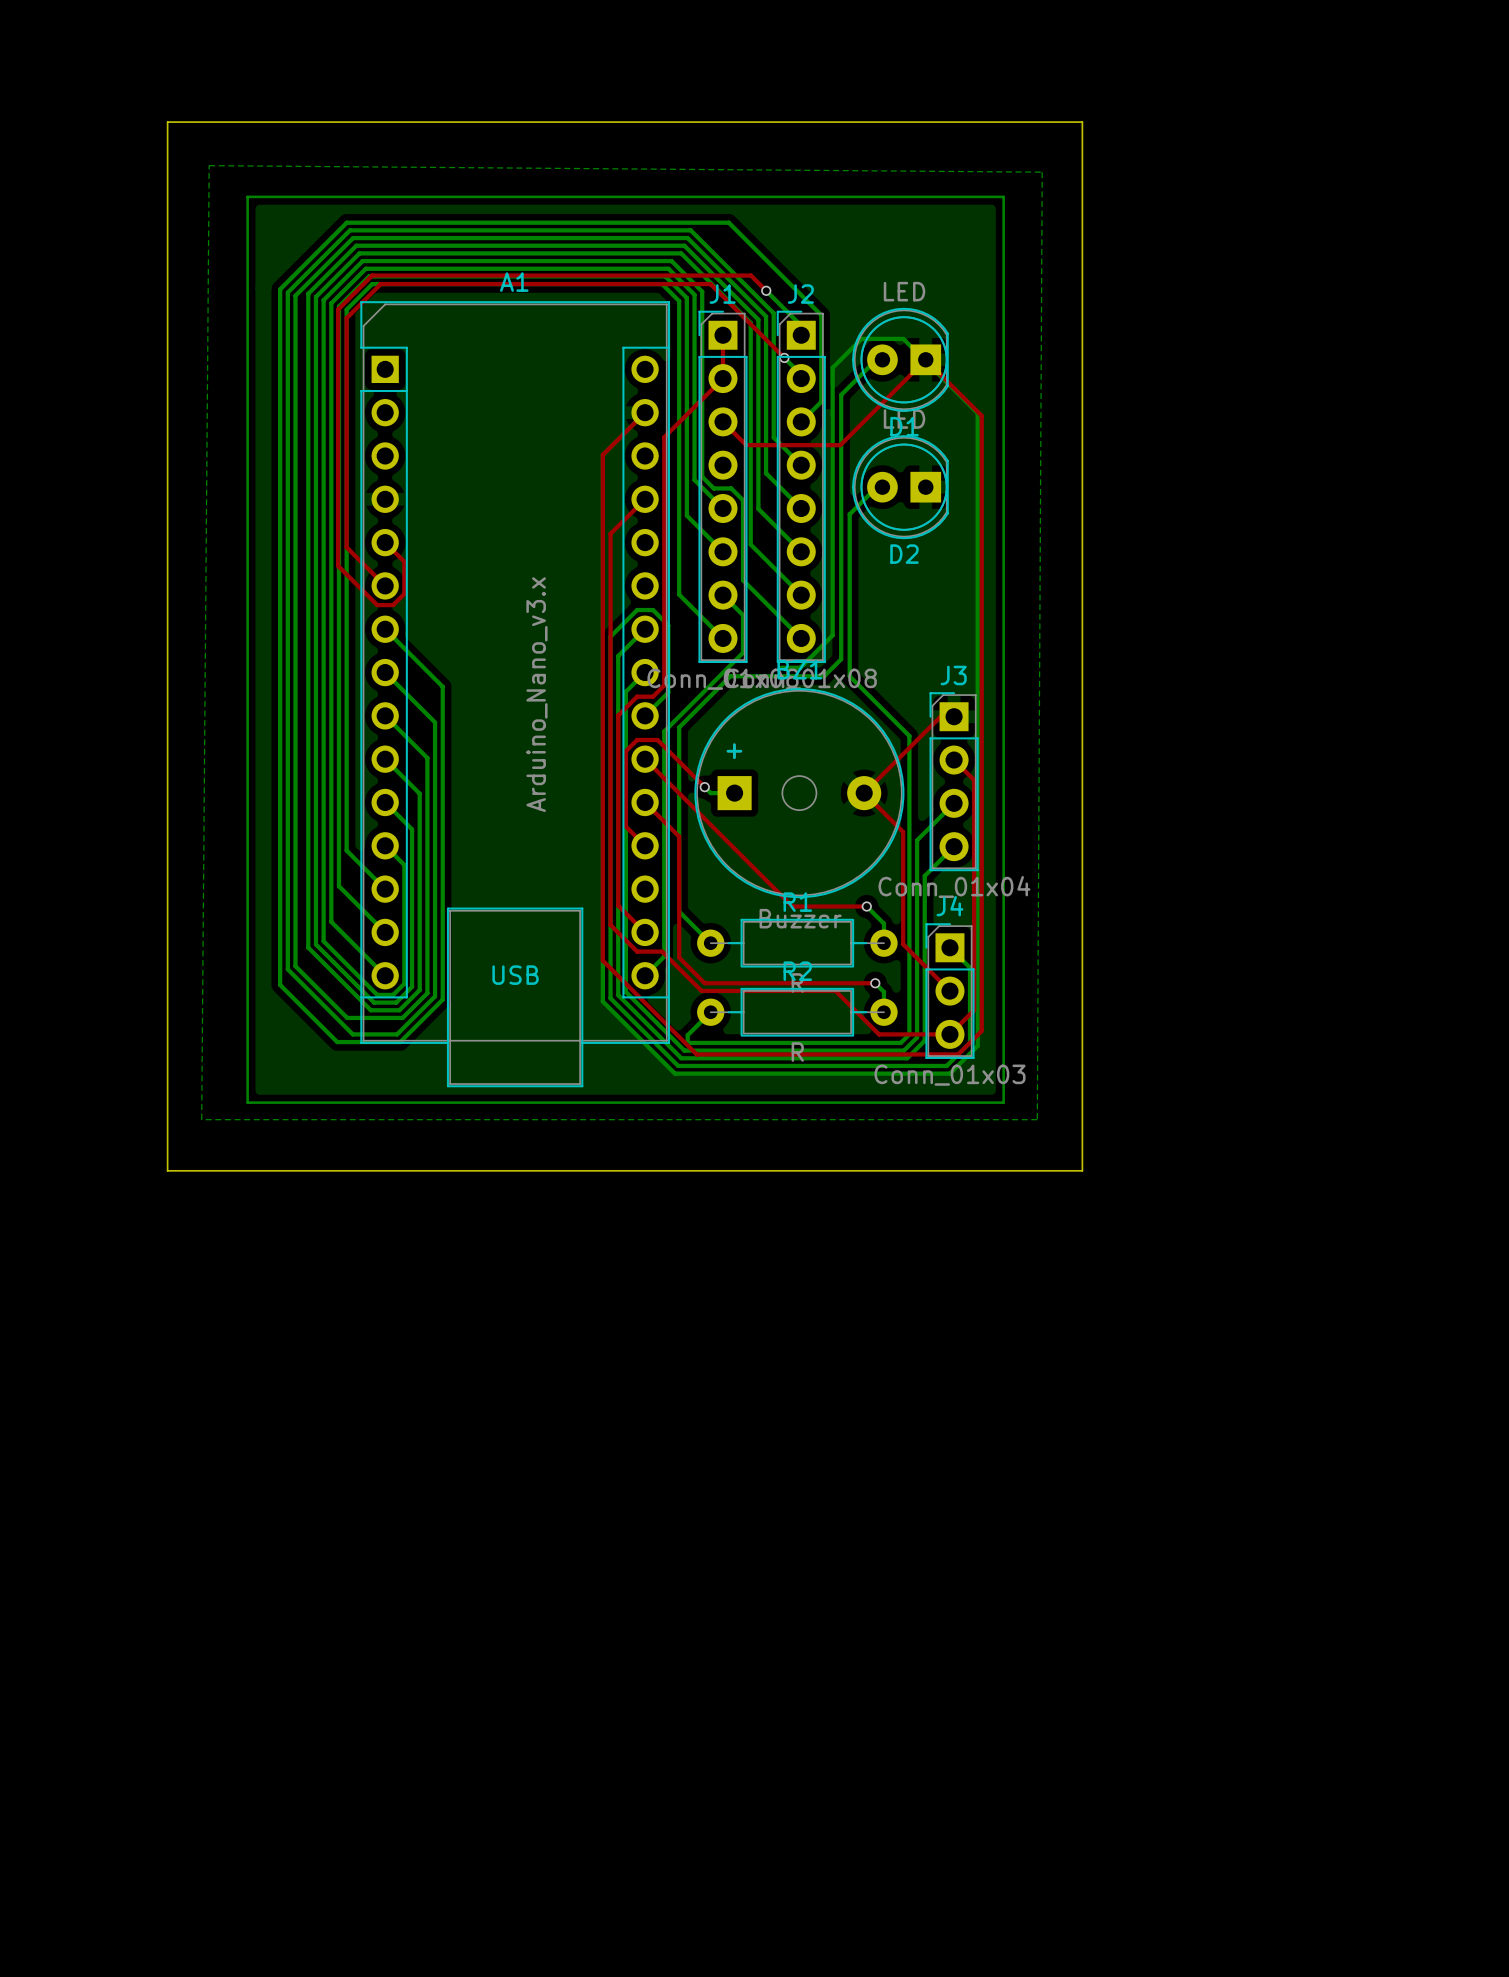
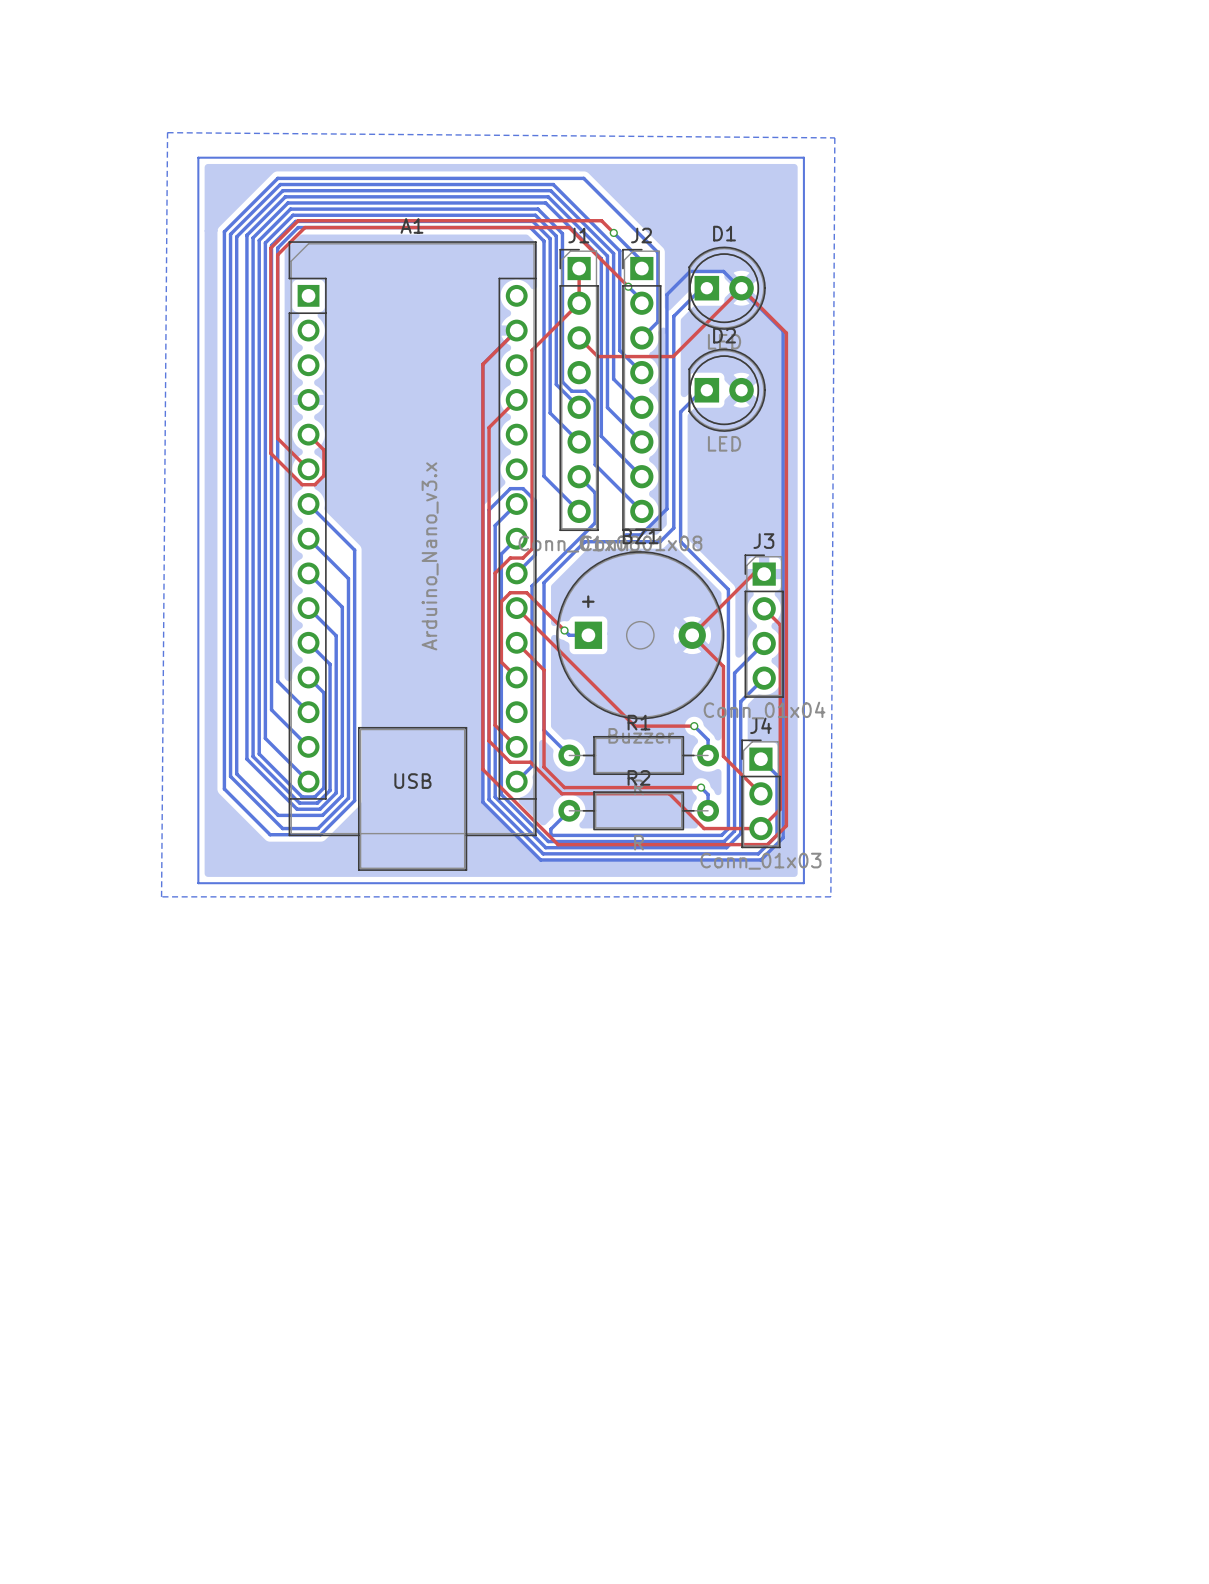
board edge: (167, 122) (1082, 122) (1082, 1170) (167, 1170) (167, 122) -> none
D1 rotation: 0° (900, 359) -> 180° (727, 288)
D2 rotation: 0° (900, 487) -> 180° (727, 390)

